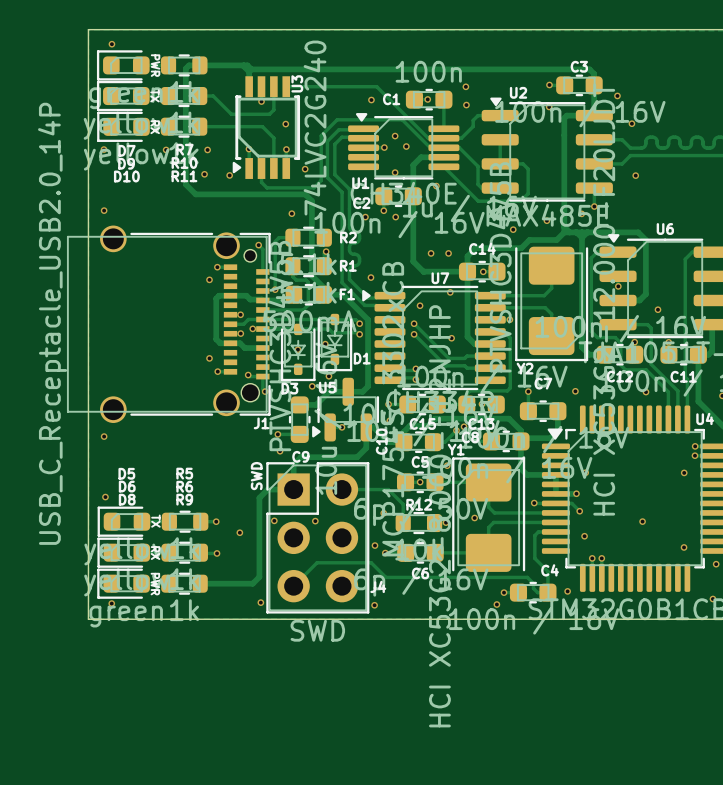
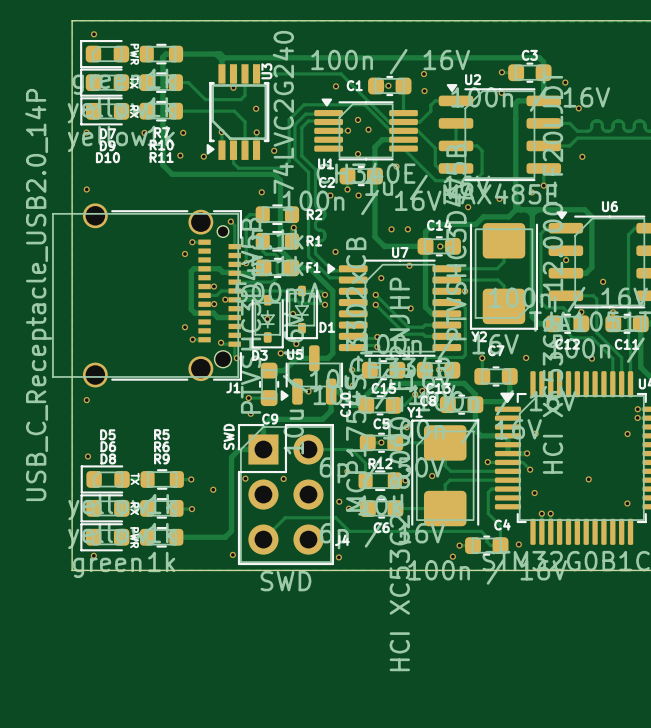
C1 value: 100n (428, 71) -> 100n / 16V (390, 61)

